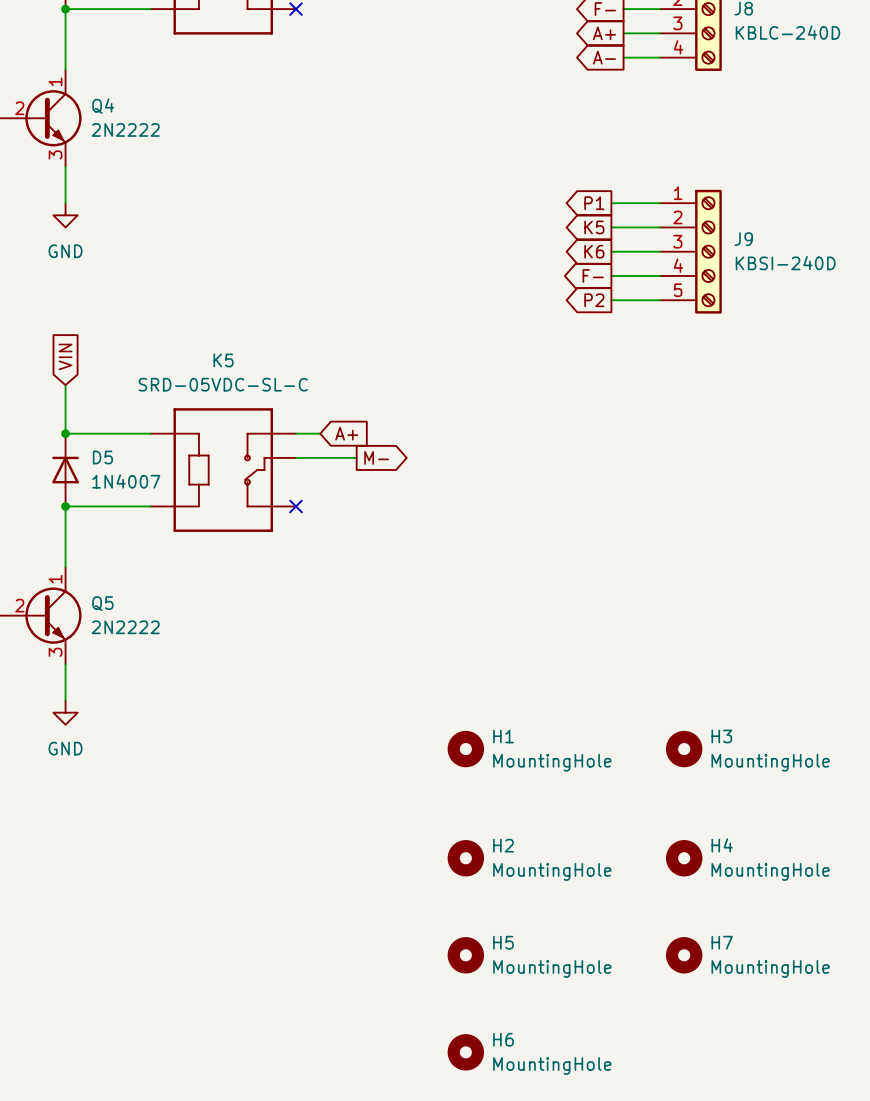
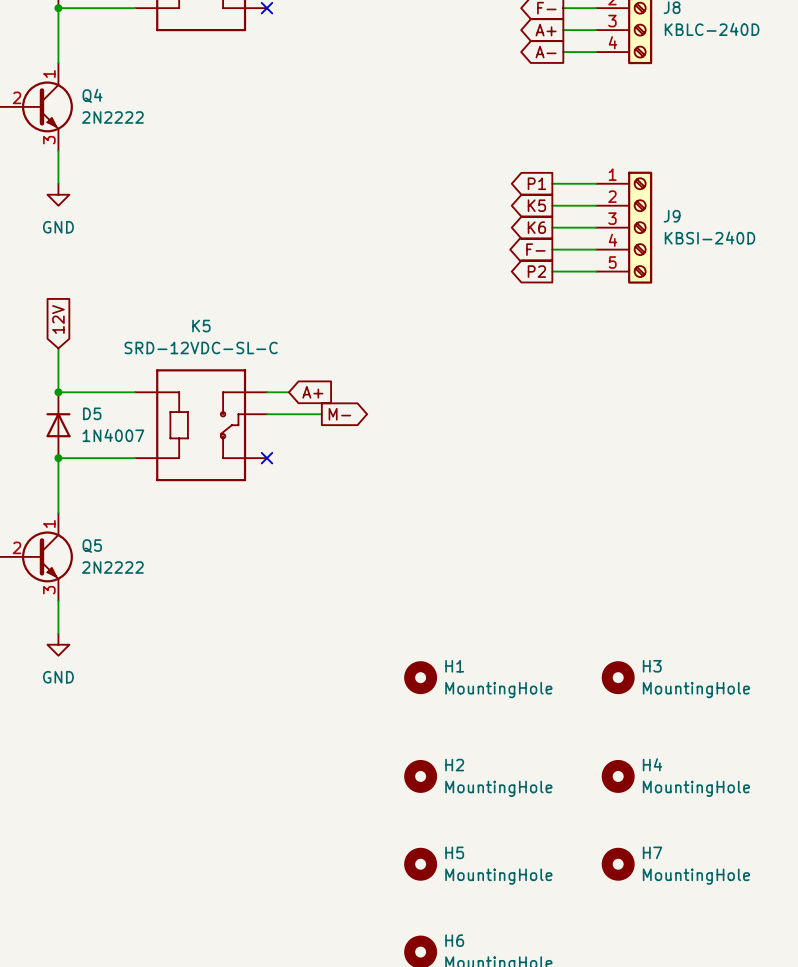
global label: VIN (65, 356) -> 12V (58, 319)
K5 value: SRD-05VDC-SL-C (223, 384) -> SRD-12VDC-SL-C (201, 347)

